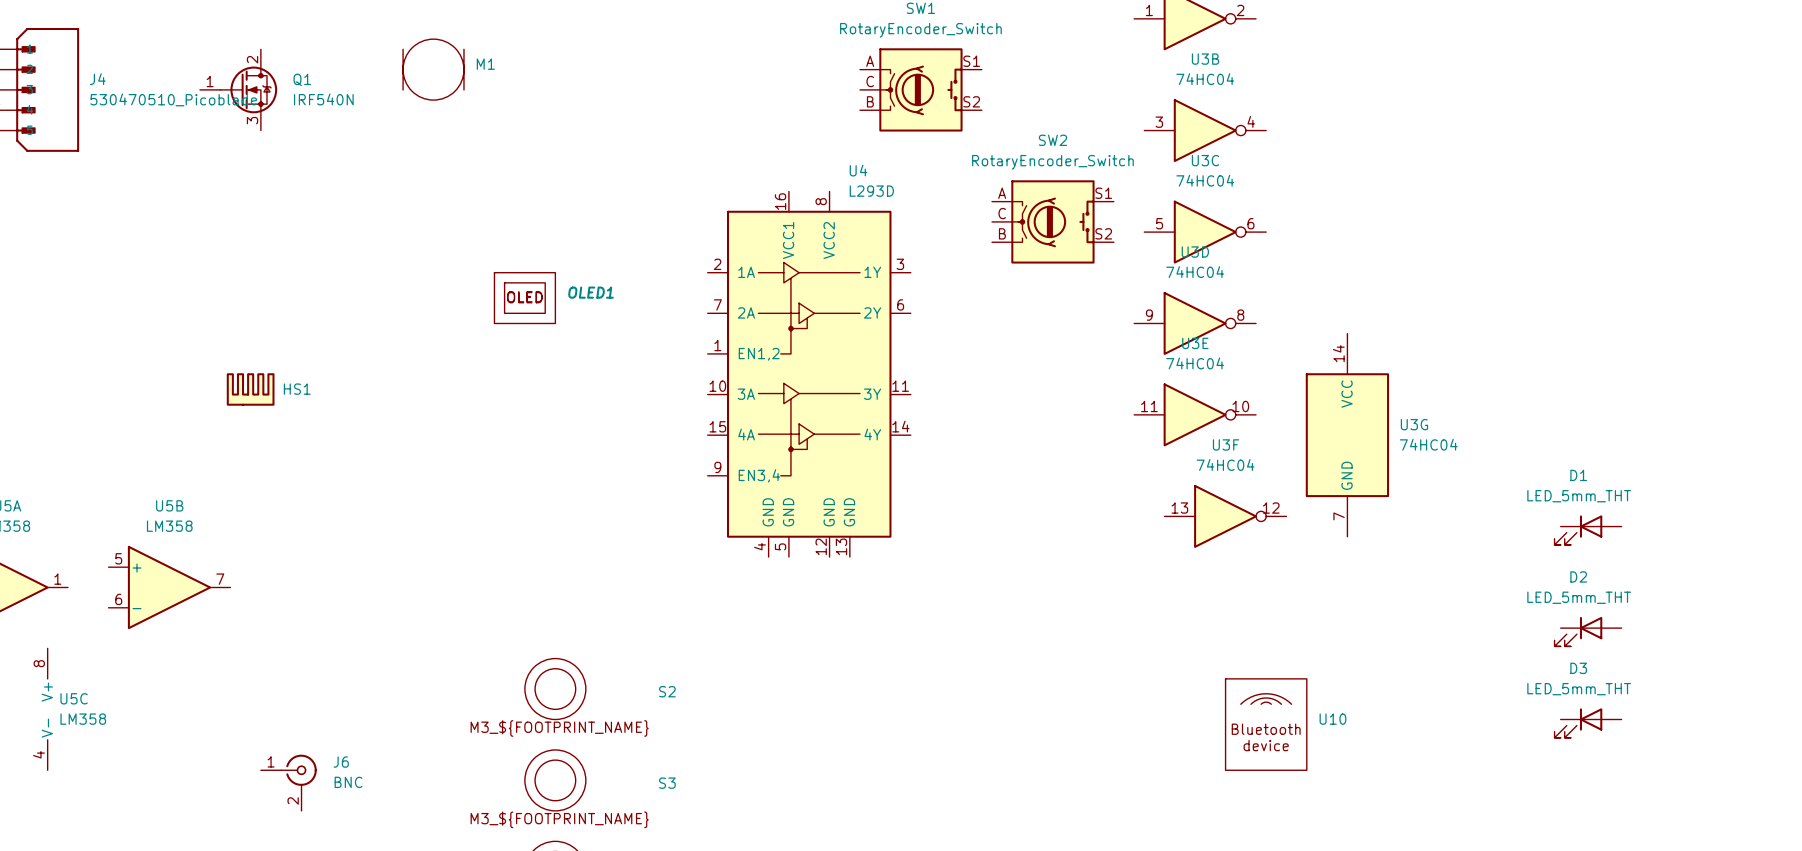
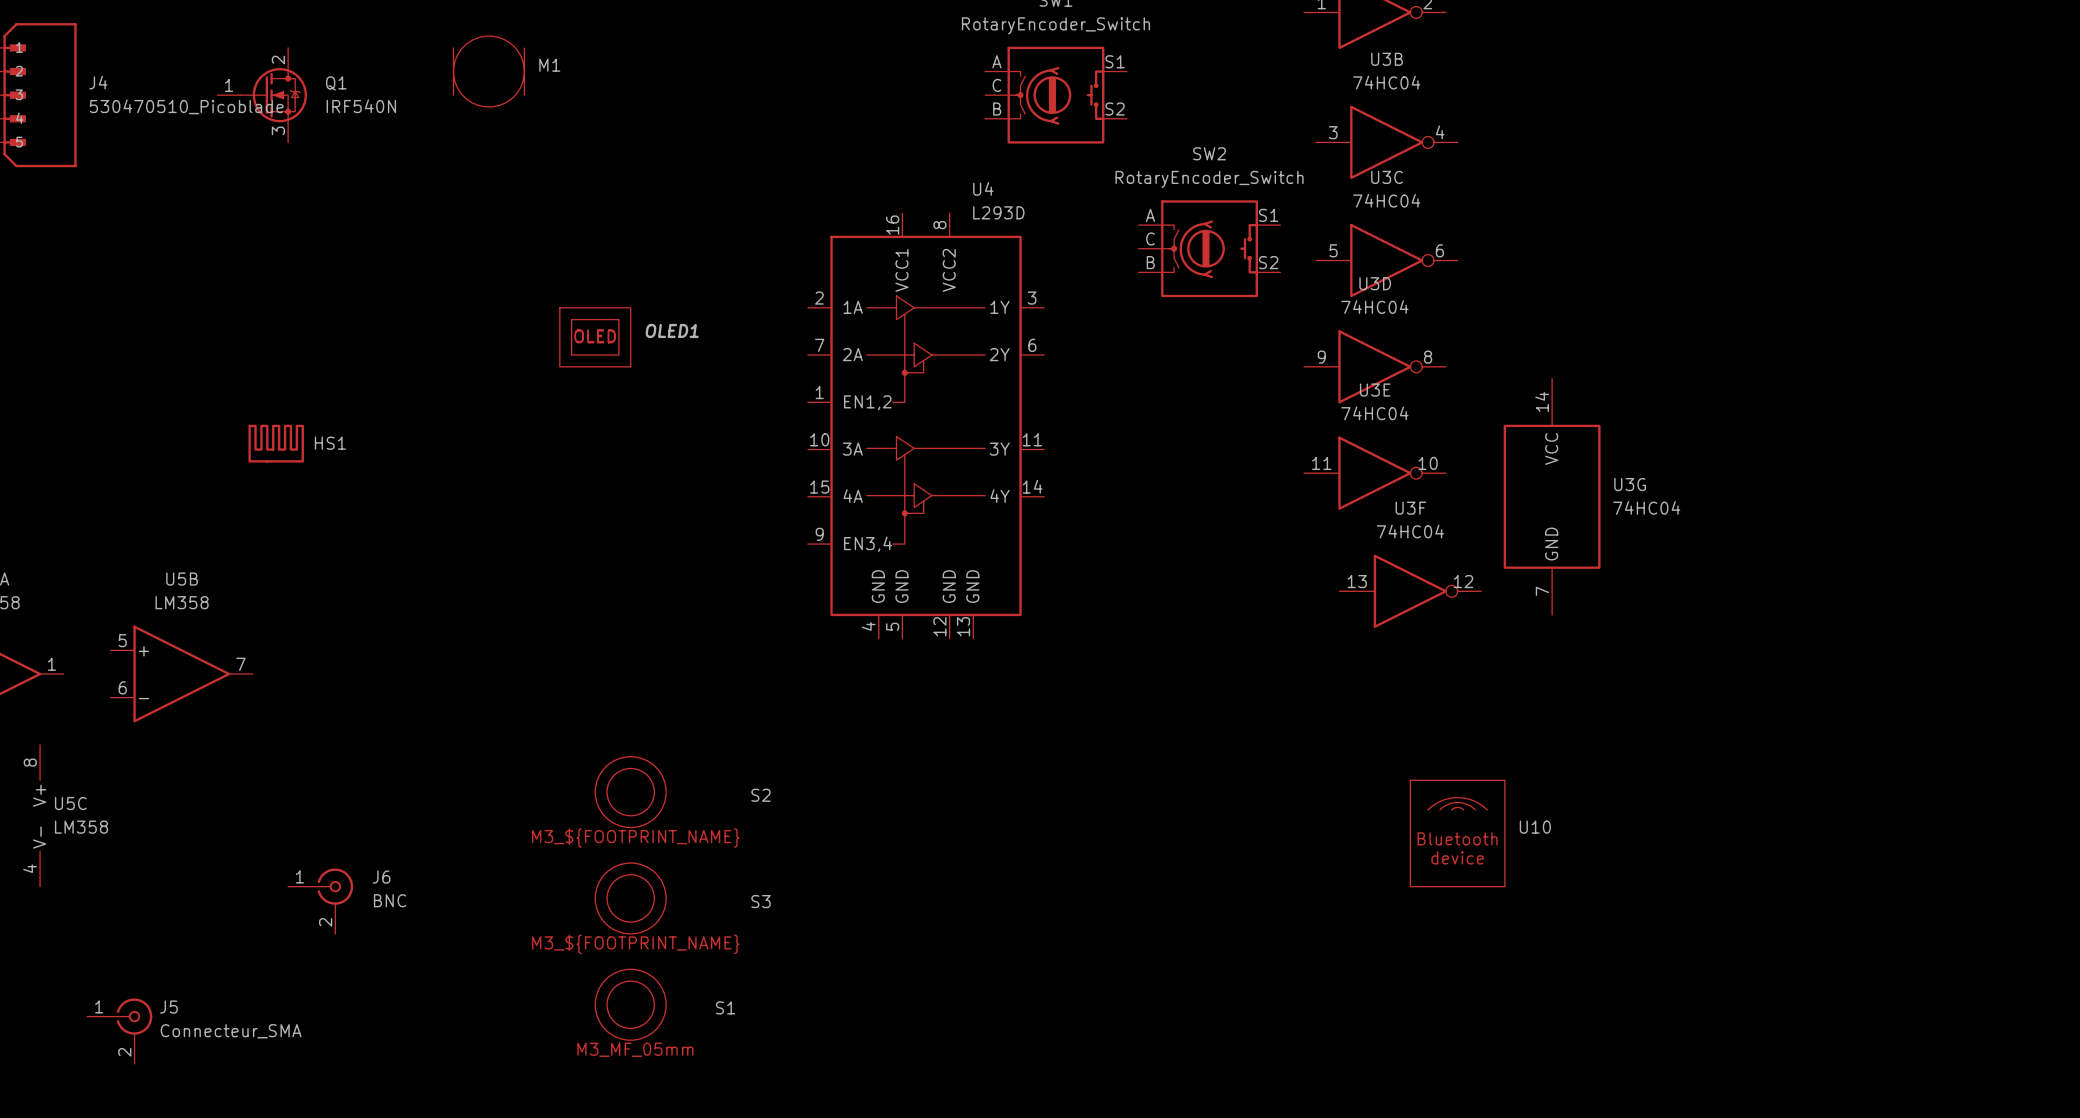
D1: LED_5mm_THT (1588, 530) -> none
D2: LED_5mm_THT (1588, 631) -> none
D3: LED_5mm_THT (1588, 723) -> none

